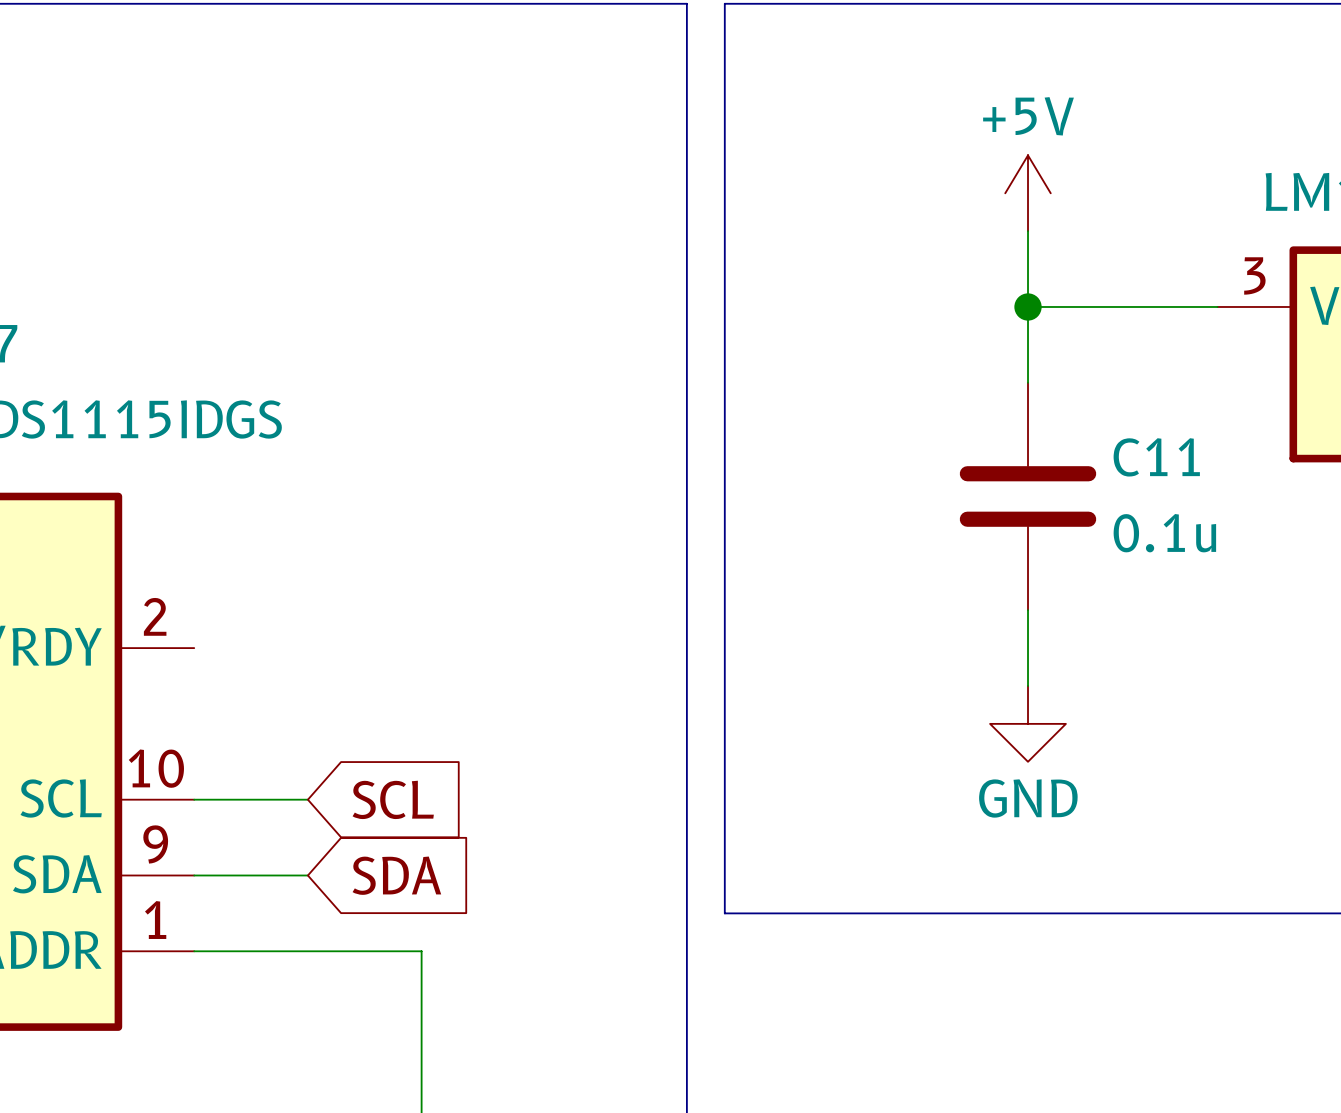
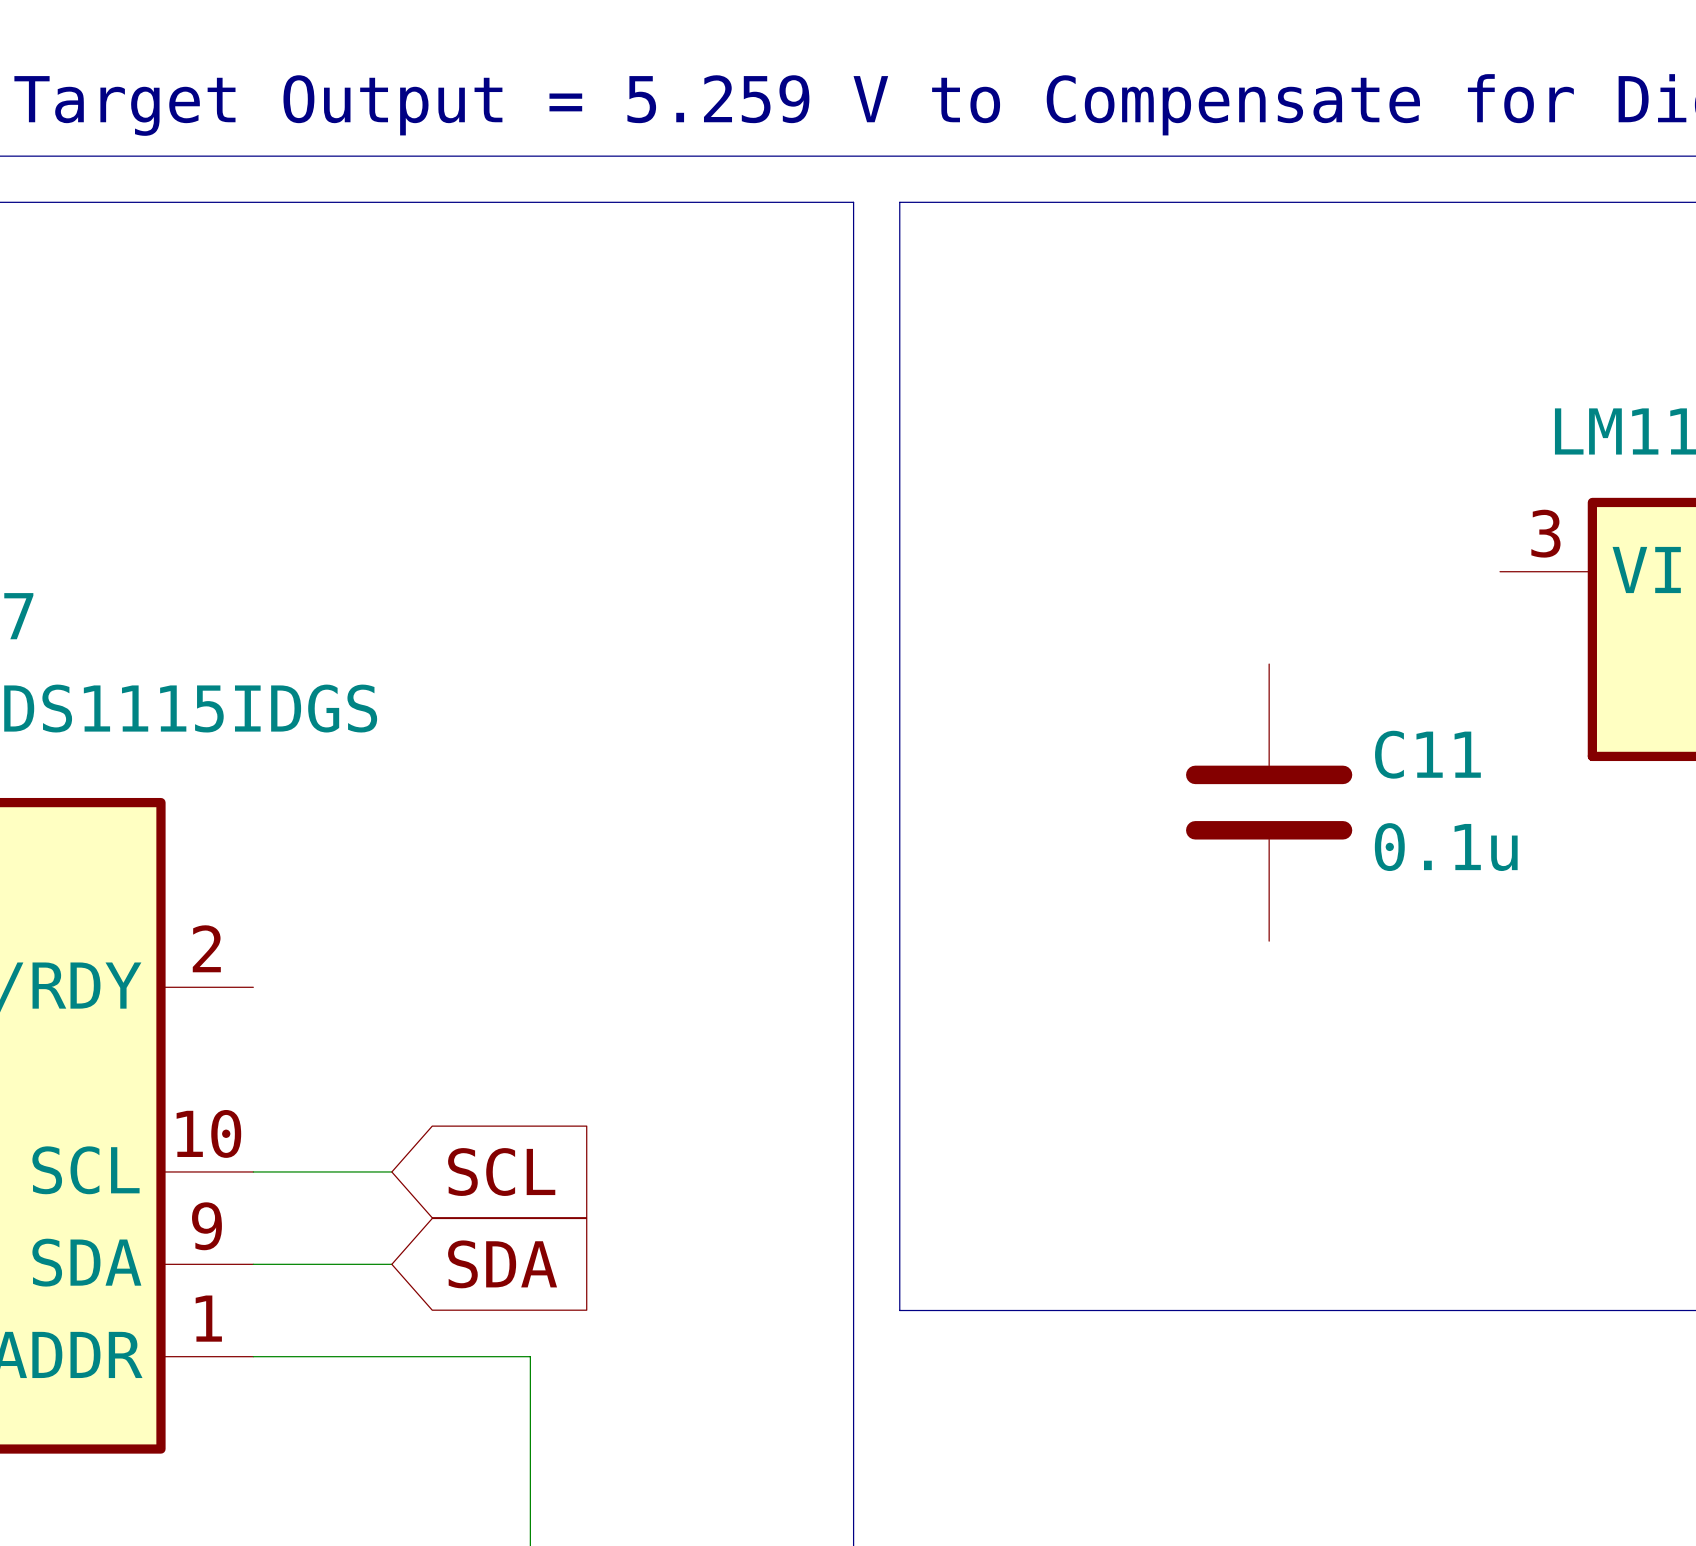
power symbol: +5V (1028, 193) -> none
wire: (1028, 231) (1028, 382) -> none
wire: (1028, 306) (1217, 306) -> none
junction: (1028, 306) -> none
wire: (1028, 610) (1028, 685) -> none
power symbol: GND (1028, 723) -> none

